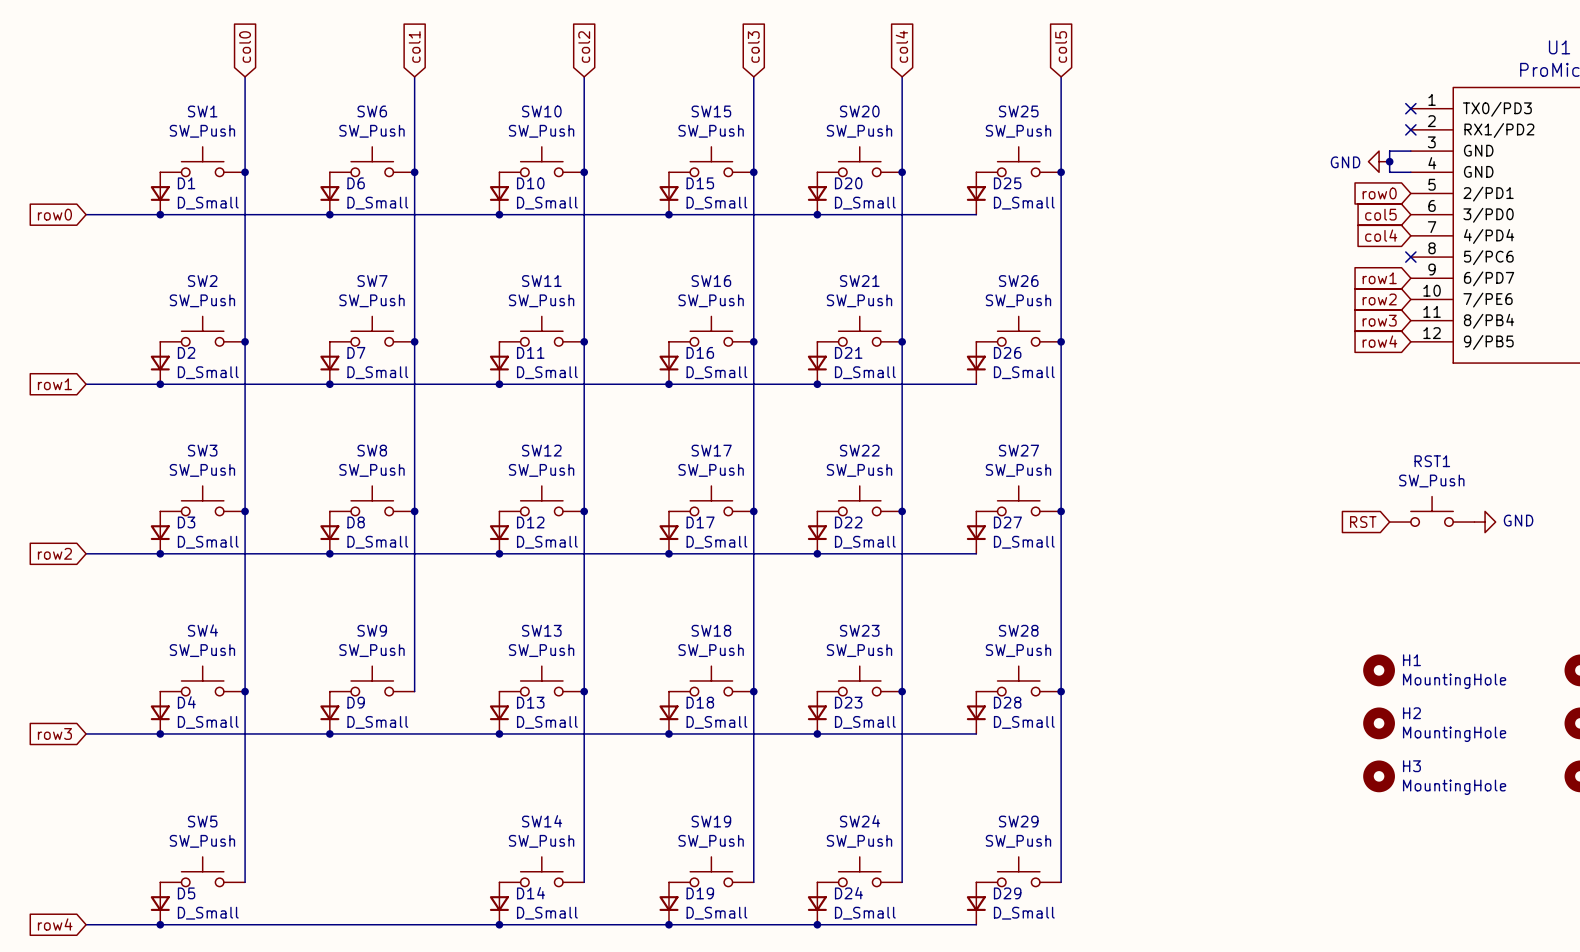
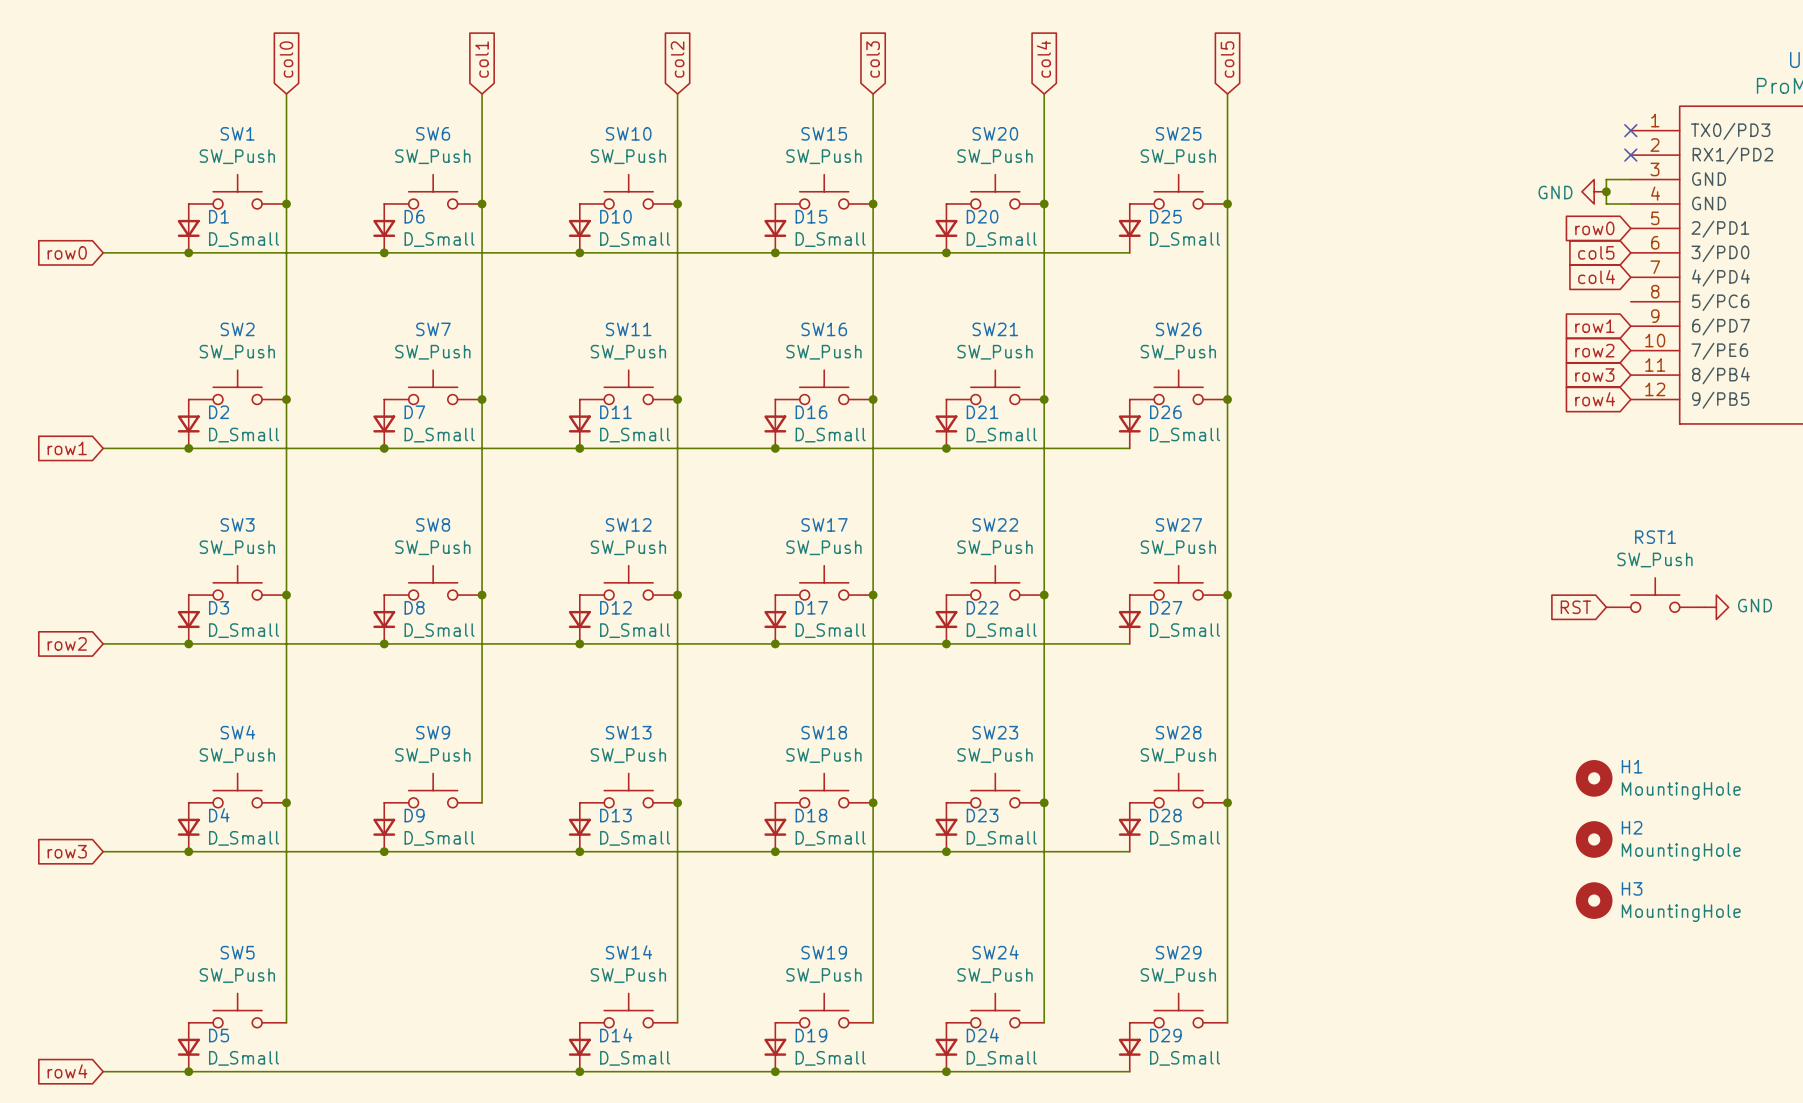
no-connect mark: (1410, 257) -> none

